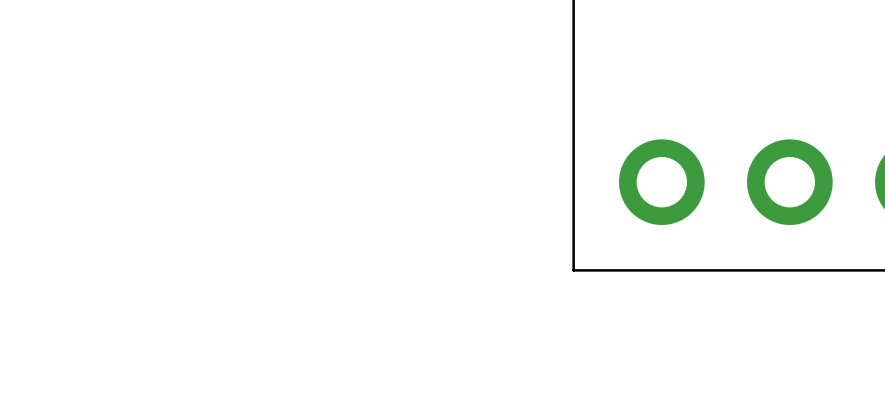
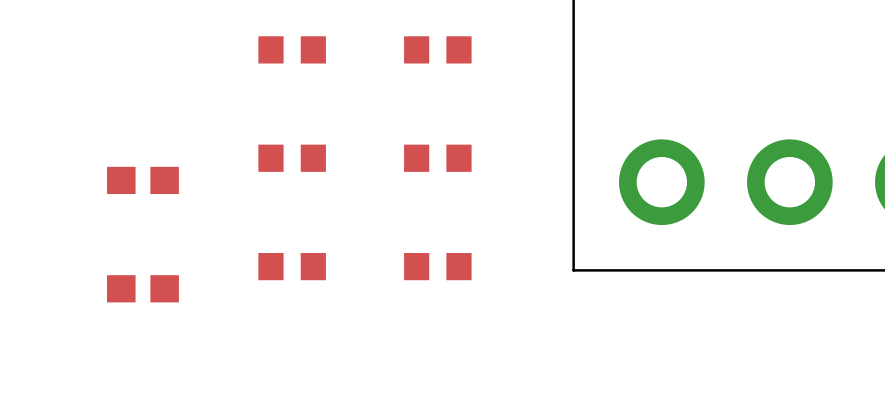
part: none -> (292, 49)
part: none -> (437, 49)
part: none -> (292, 158)
part: none -> (437, 158)
part: none -> (142, 180)
part: none -> (292, 266)
part: none -> (437, 266)
part: none -> (142, 288)

